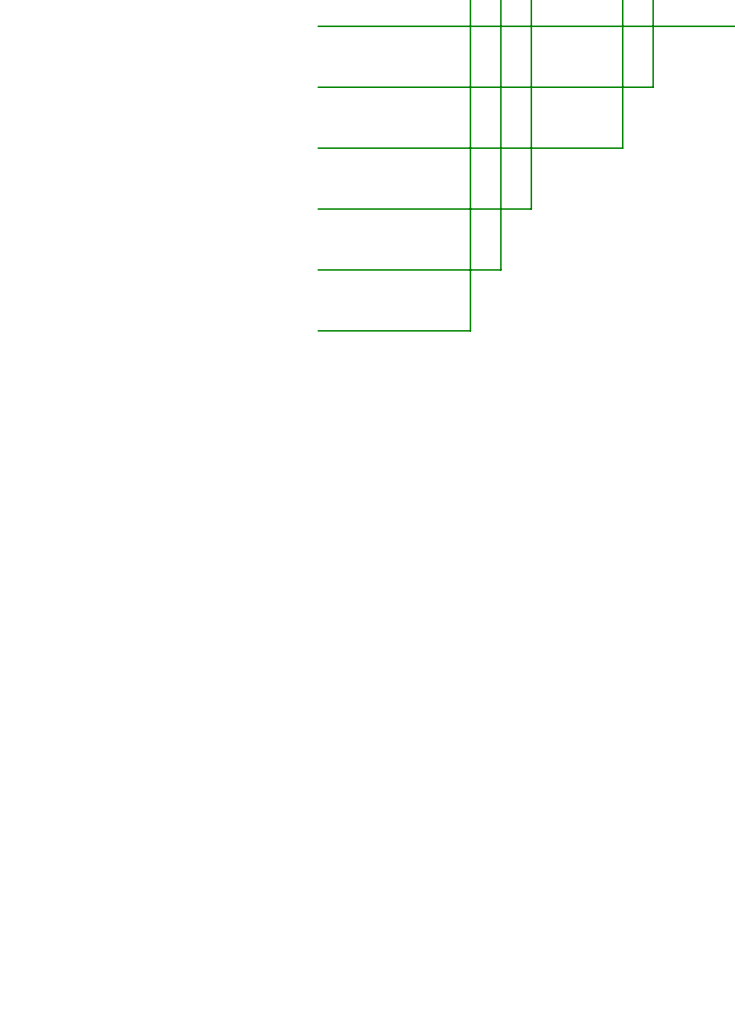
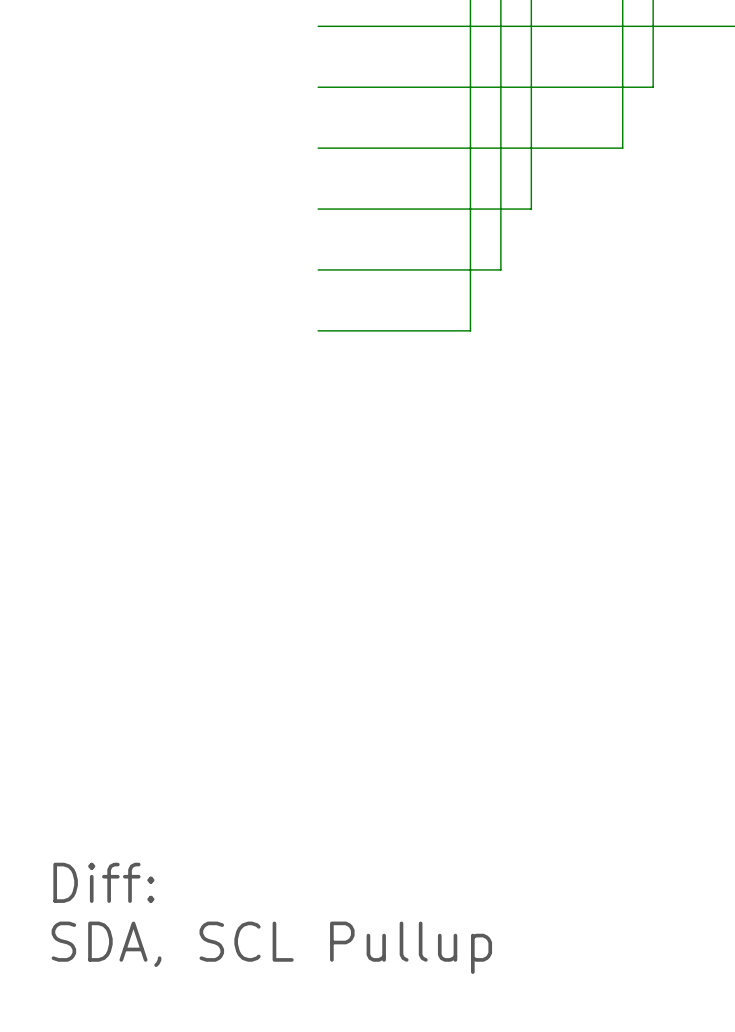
text: none -> Diff: (103, 882)
text: none -> SDA, SCL Pullup (271, 947)

